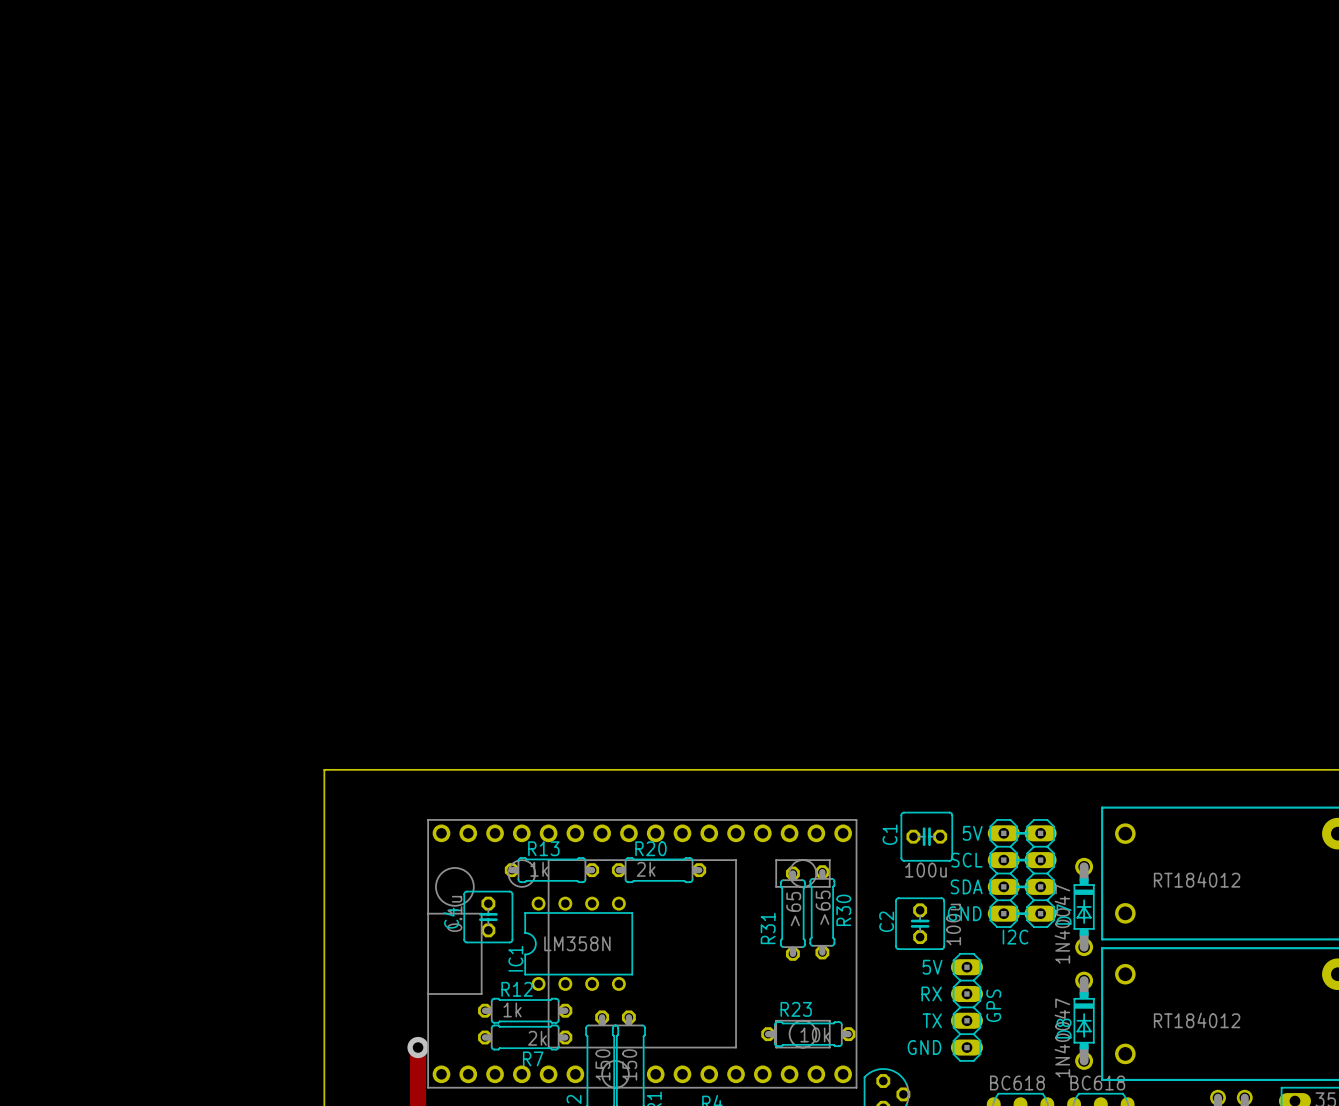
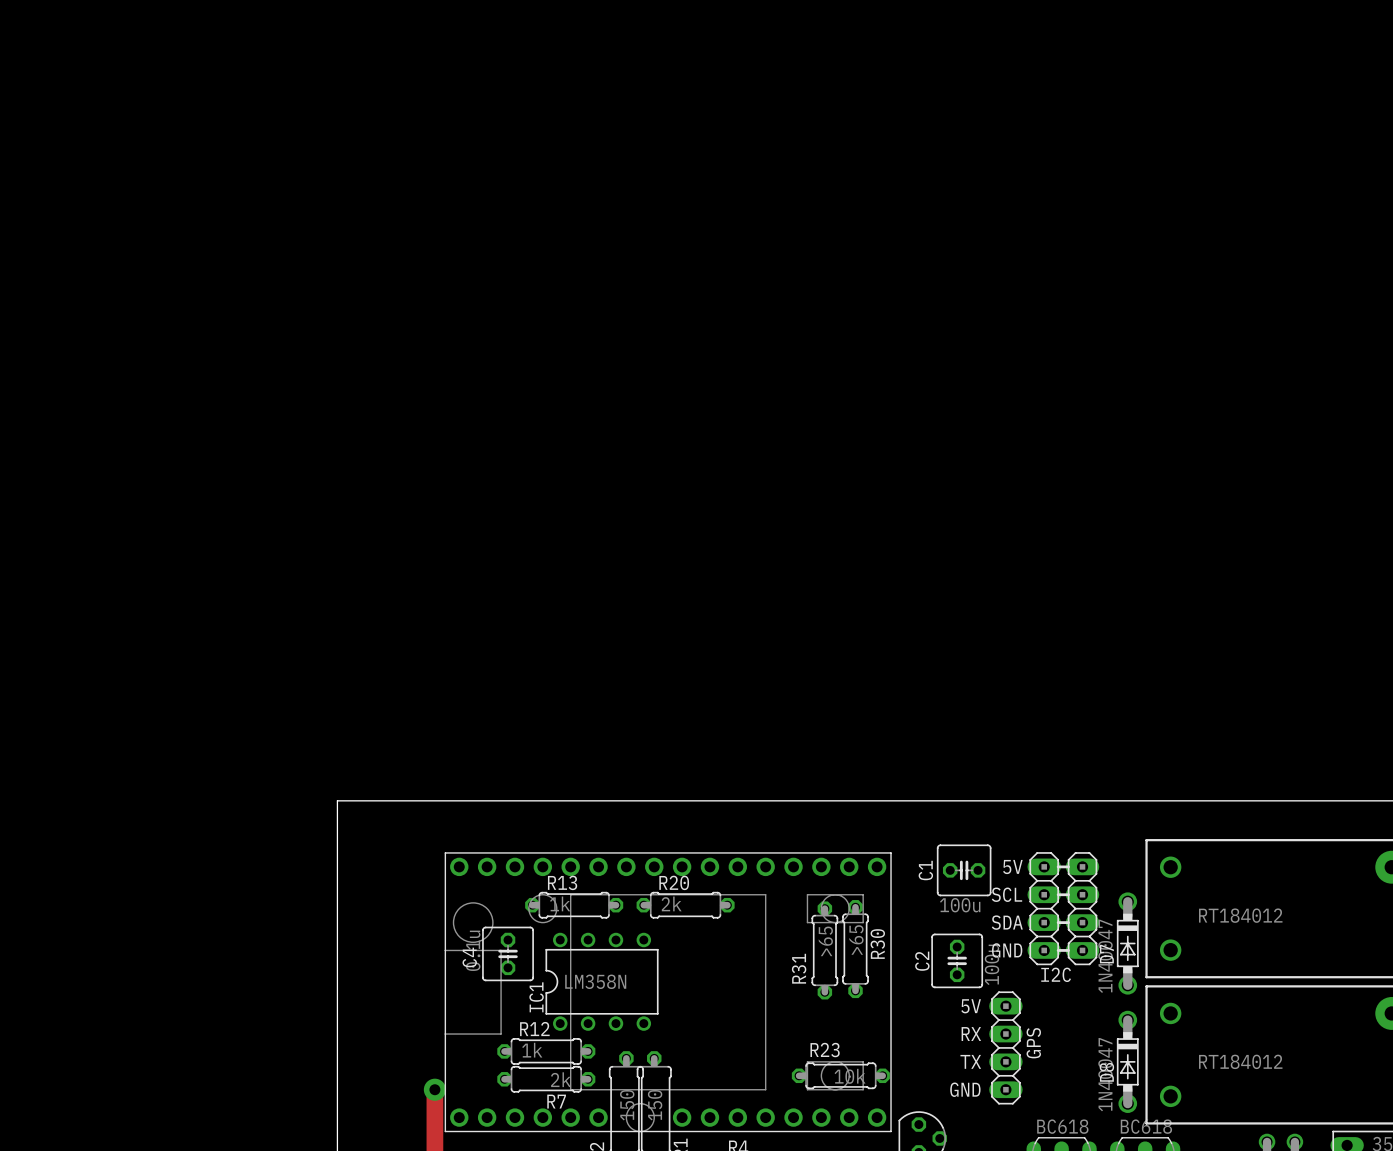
part footprint: [427, 819, 858, 1089] -> [444, 852, 892, 1133]

